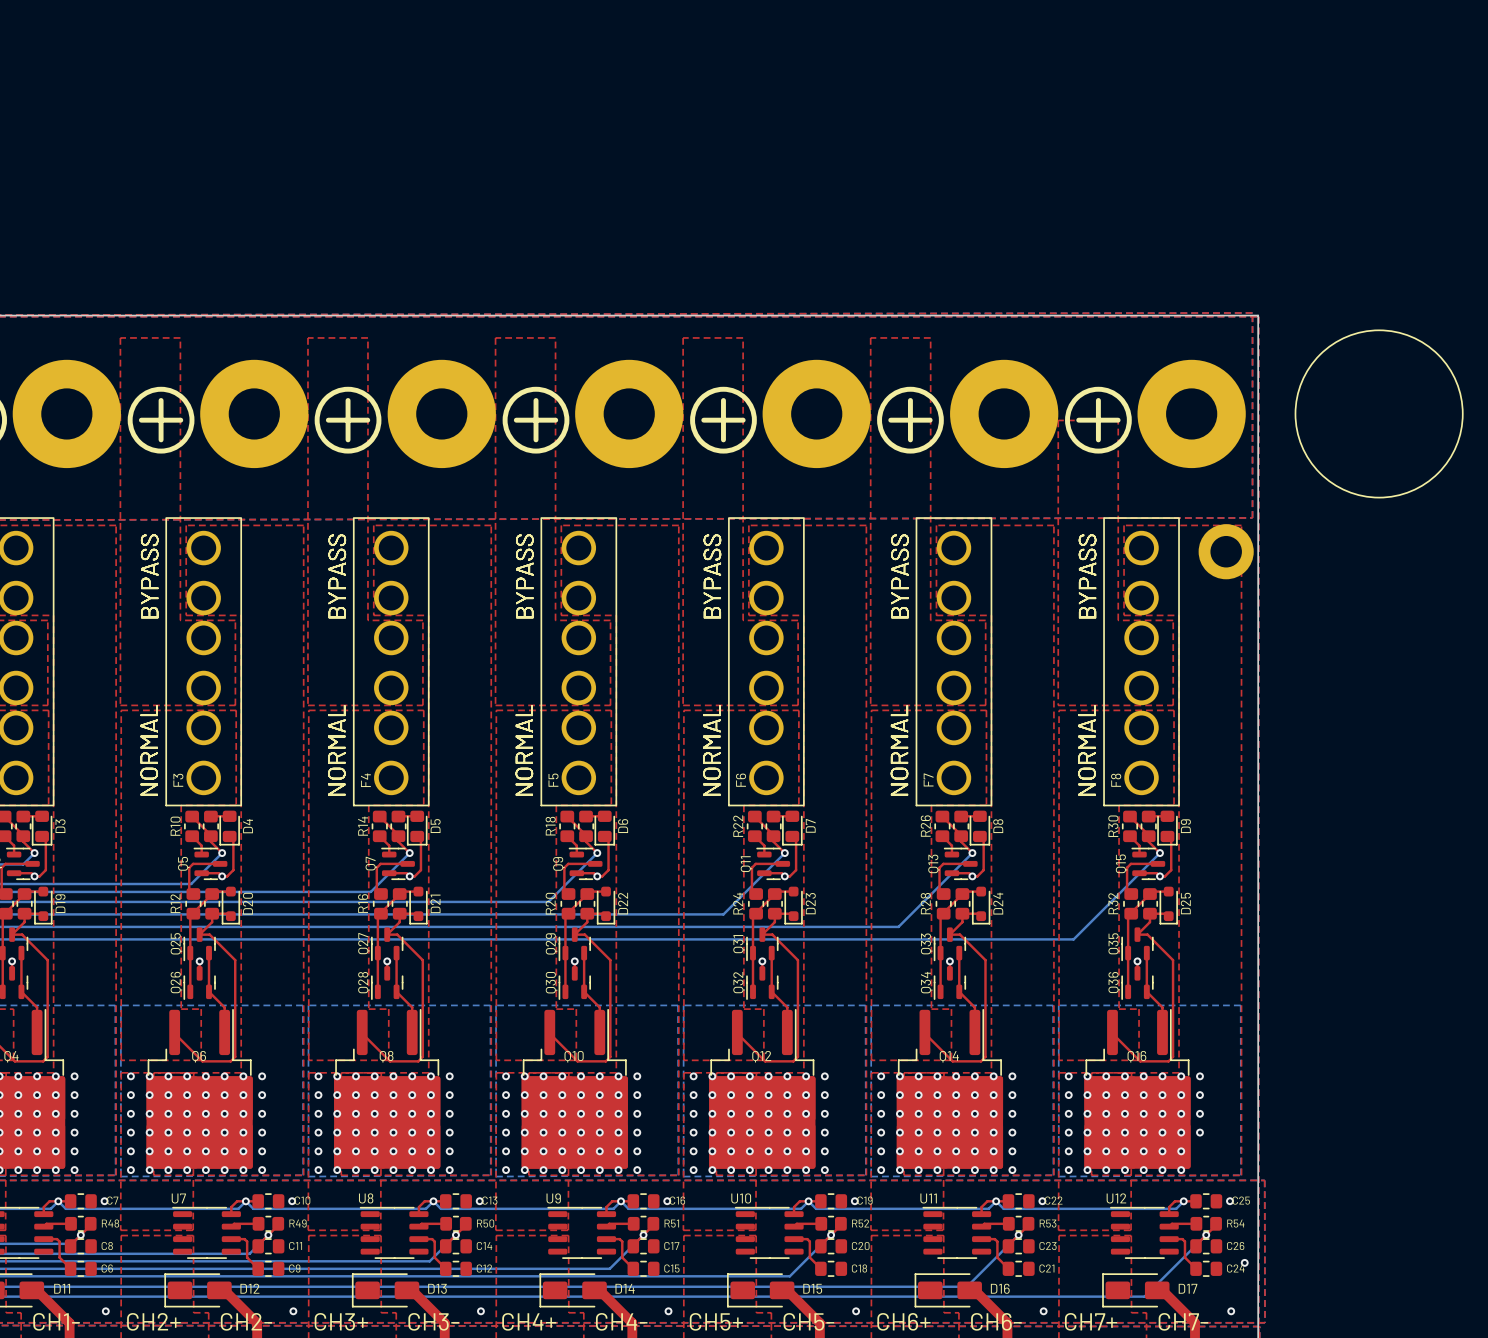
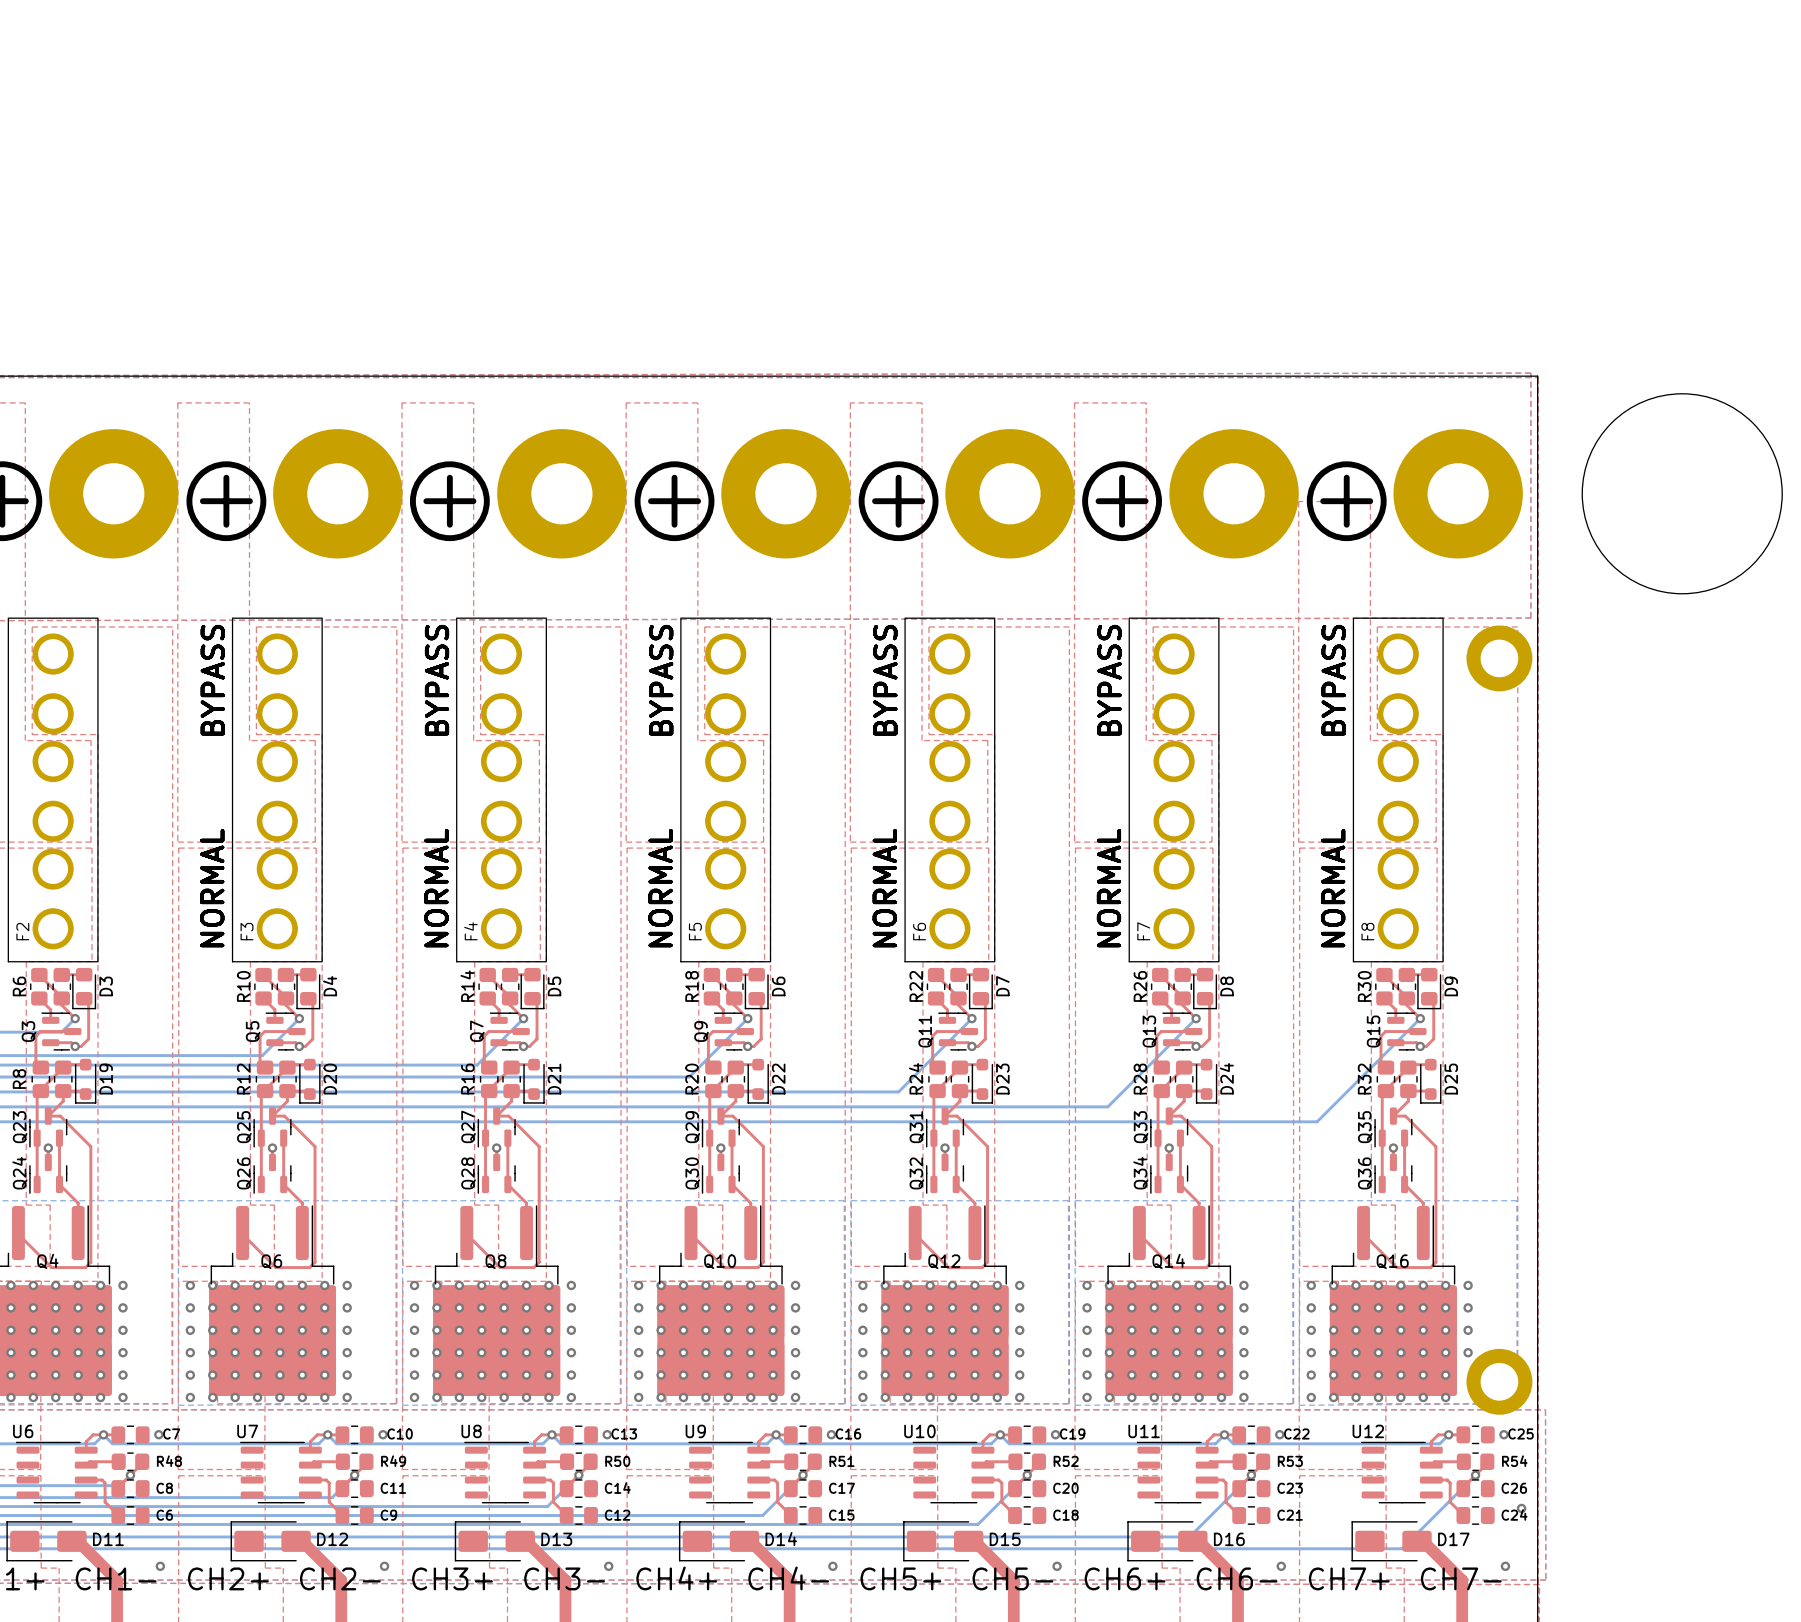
part: none -> (1499, 1381)

